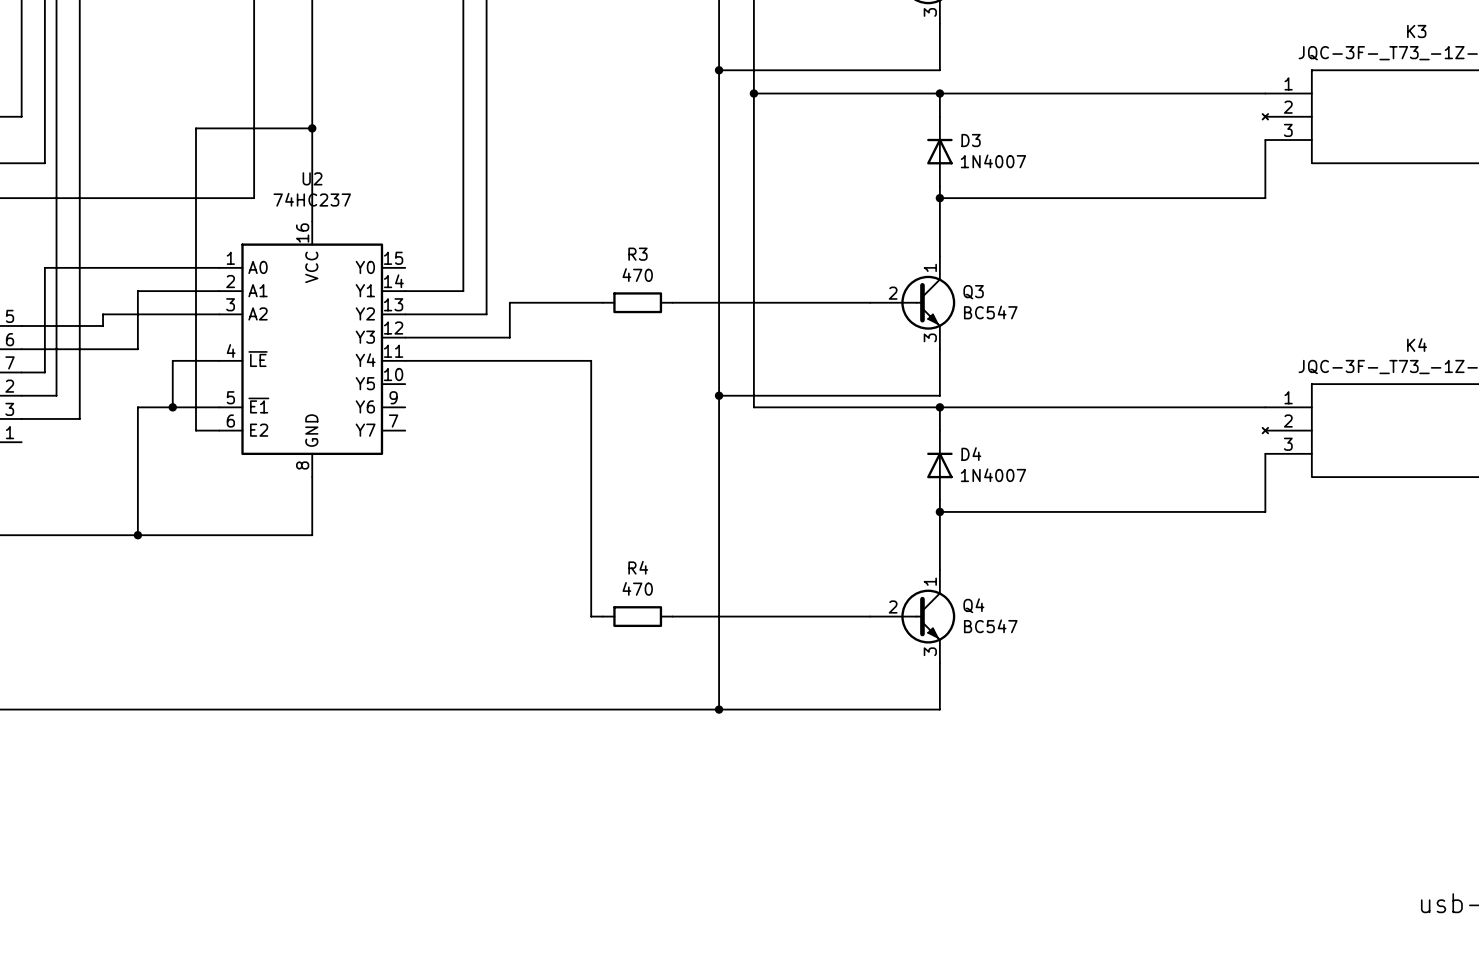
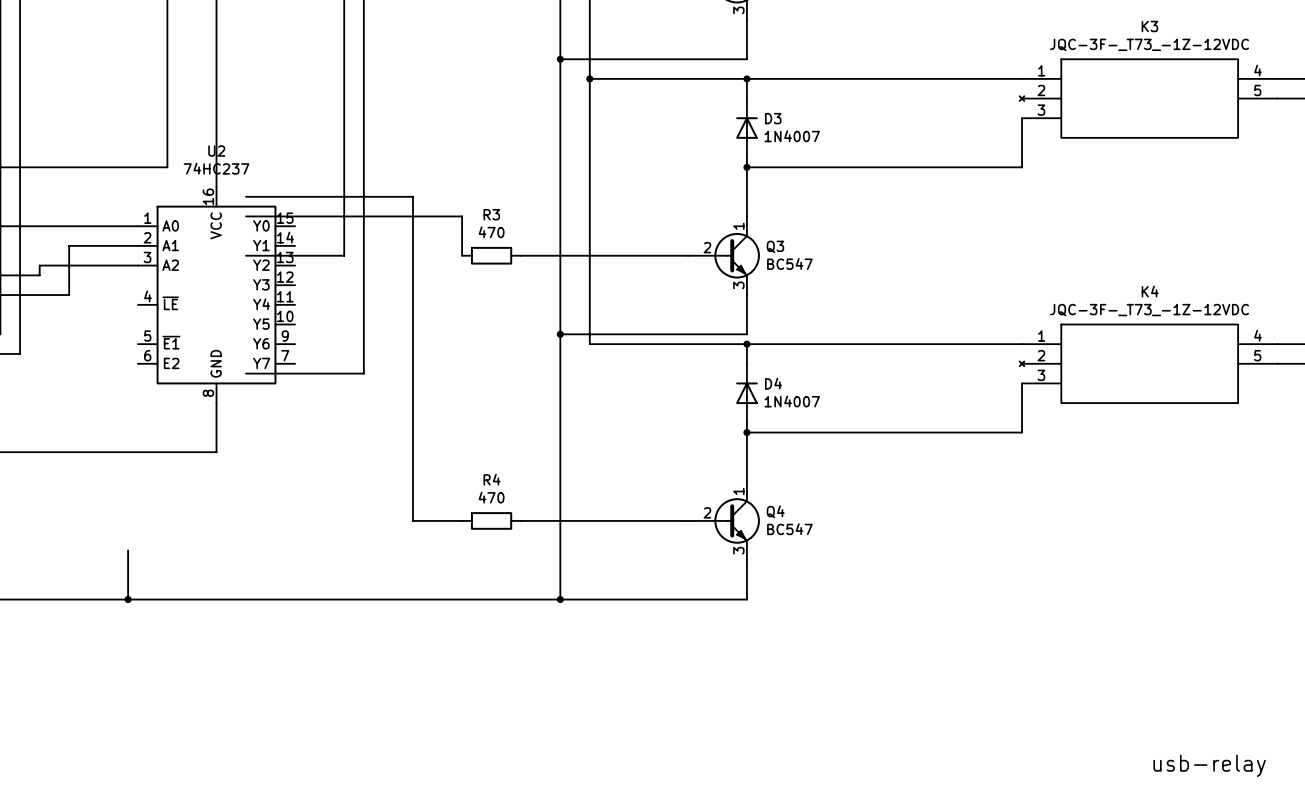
wire: (312, 128) (196, 128) (196, 430) (219, 430) -> none
junction: (312, 128) -> none
wire: (405, 291) (463, 291) -> (245, 255) (344, 255) (344, 245)
wire: (602, 302) (509, 302) (509, 337) (405, 337) -> (462, 255) (462, 216) (245, 216)
wire: (405, 314) (486, 314) -> (245, 373) (363, 373) (363, 265)
wire: (219, 360) (172, 360) (172, 407) -> none
wire: (405, 360) (591, 360) (591, 616) -> (245, 196) (412, 196) (412, 520) (452, 520)
junction: (172, 407) -> none
wire: (219, 407) (137, 407) (137, 535) -> none
junction: (137, 535) -> none
wire: none -> (128, 550) (128, 599)
junction: none -> (128, 599)

